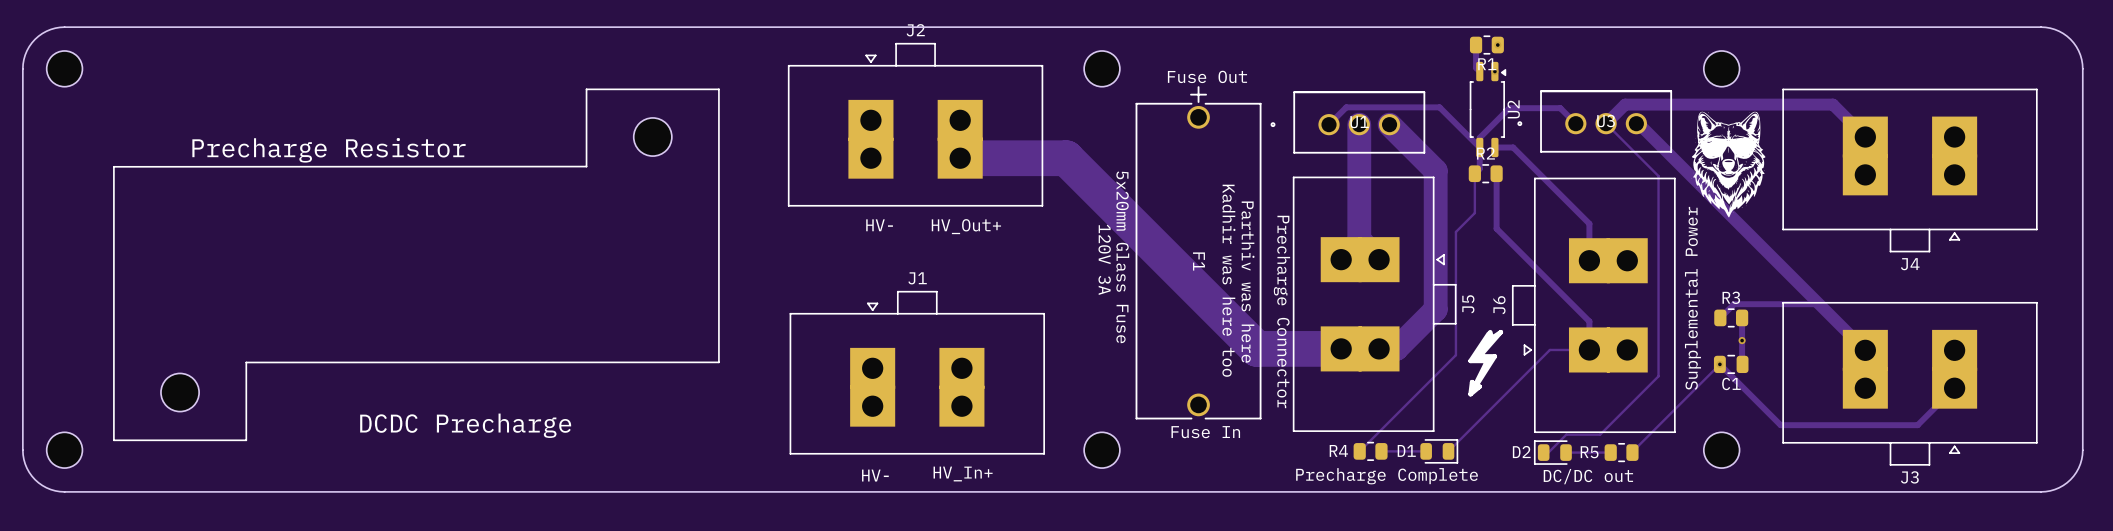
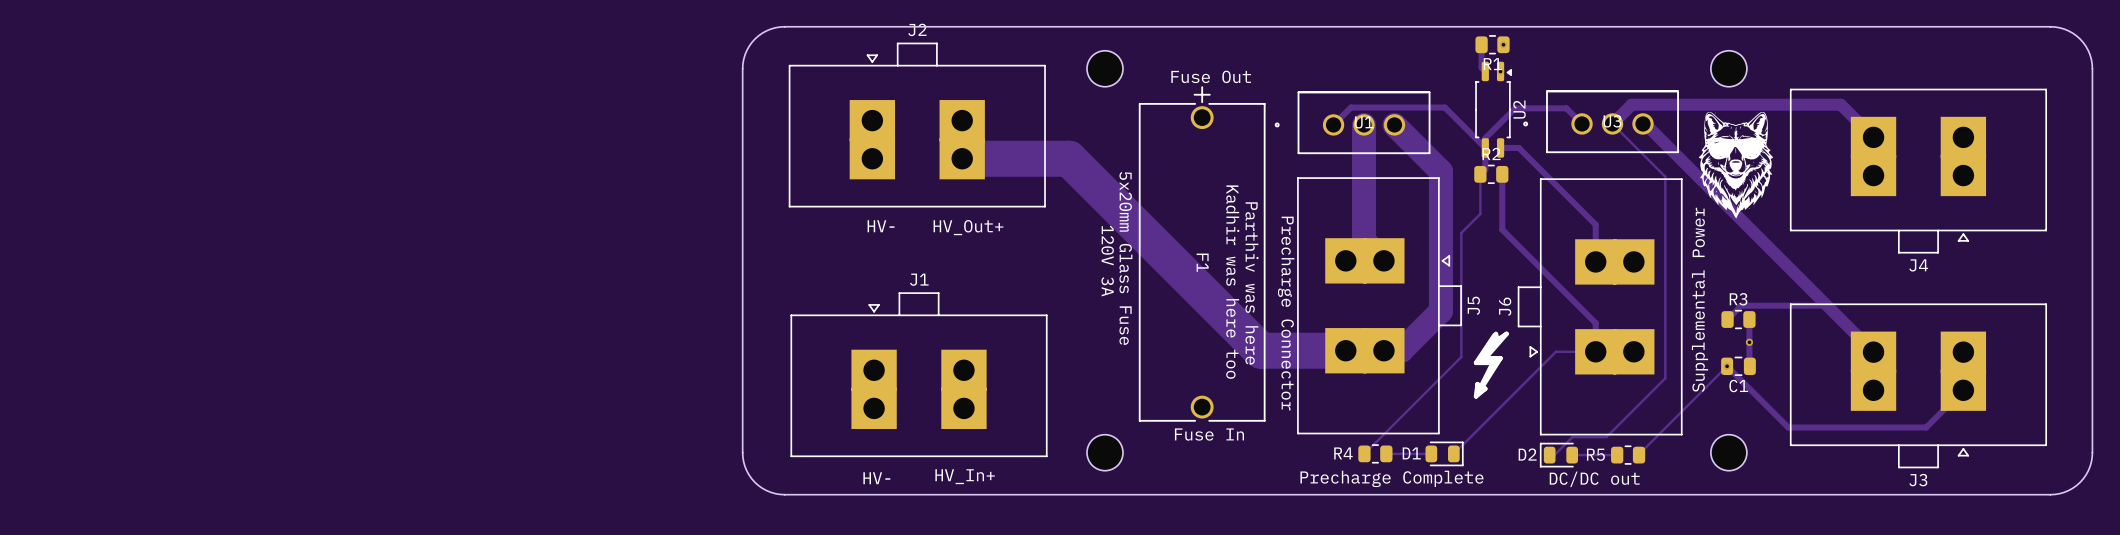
board edge: (783, 27) (64, 27) (50, 29) (35, 39) (25, 55) (22, 68) (22, 450) (26, 468) (35, 479) (42, 485) (50, 489) (64, 491) (783, 491) -> (784, 26) (770, 29) (754, 39) (746, 50) (742, 68) (742, 457) (746, 470) (754, 482) (770, 492) (784, 494)
part: (64, 68) -> none
line: (586, 89) (718, 89) (718, 362) (246, 362) (246, 440) (113, 440) (113, 166) (586, 166) (586, 89) -> none
part: (652, 137) -> none
text: Precharge Resistor (328, 150) -> none
part: (180, 392) -> none
text: DCDC Precharge (465, 425) -> none
part: (64, 450) -> none

